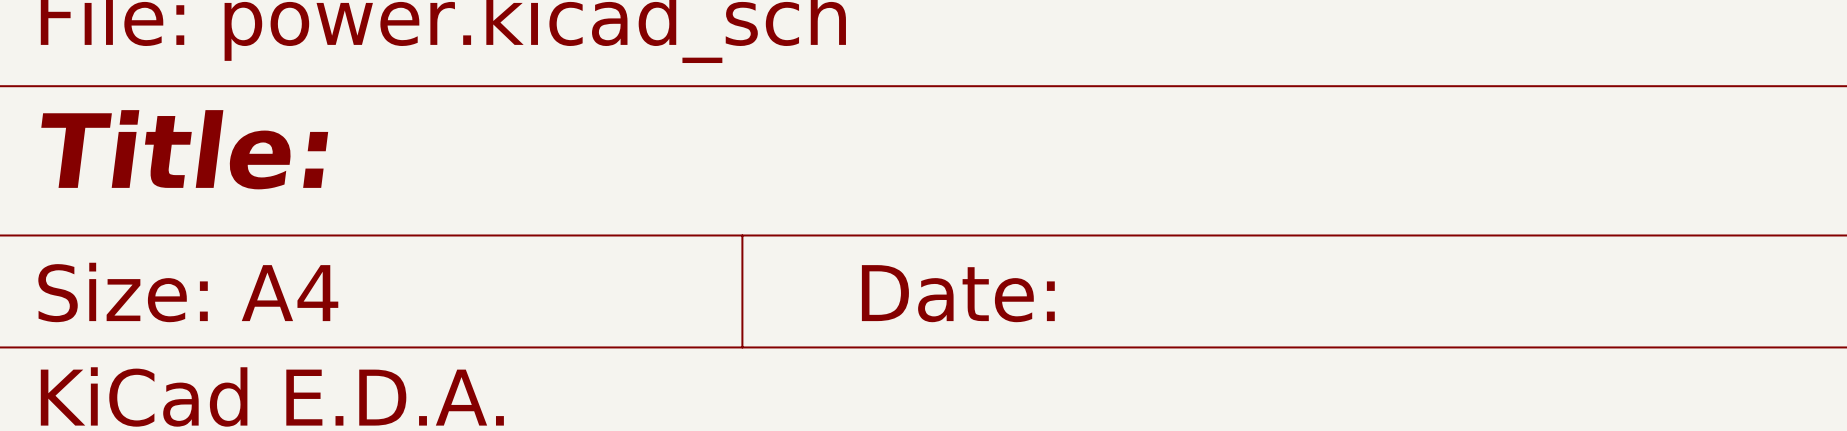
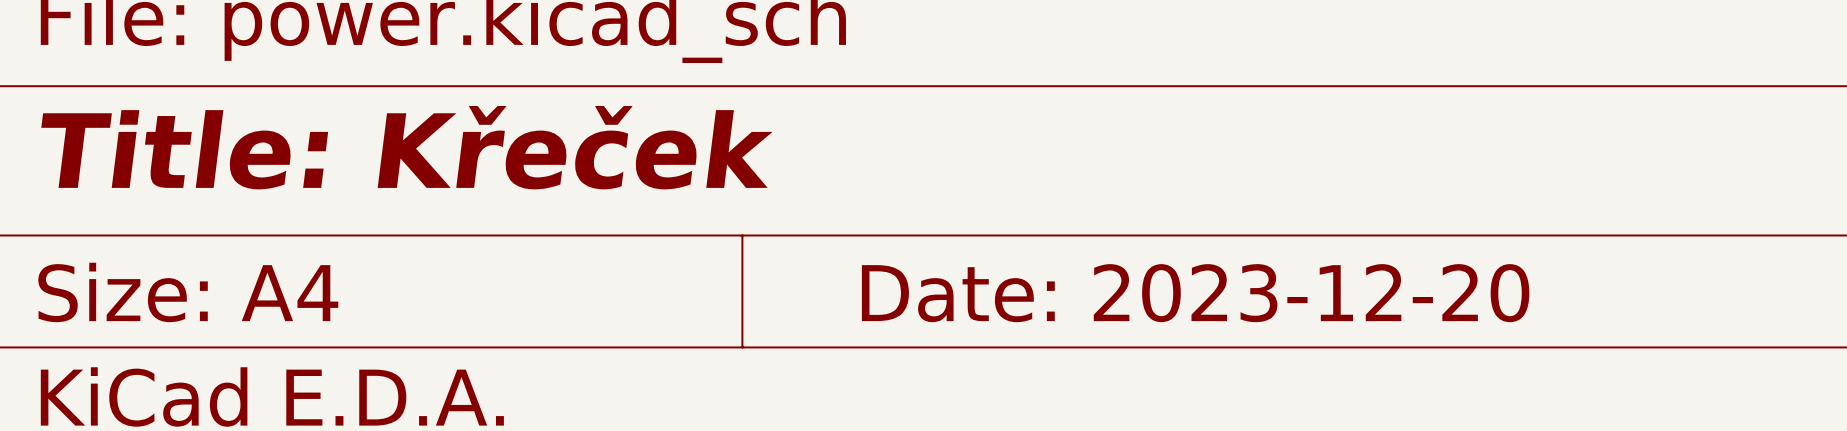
title block: Title: (184, 149) -> Title: Křeček (406, 147)
title block: Date: (958, 293) -> Date: 2023-12-20 (1195, 293)

